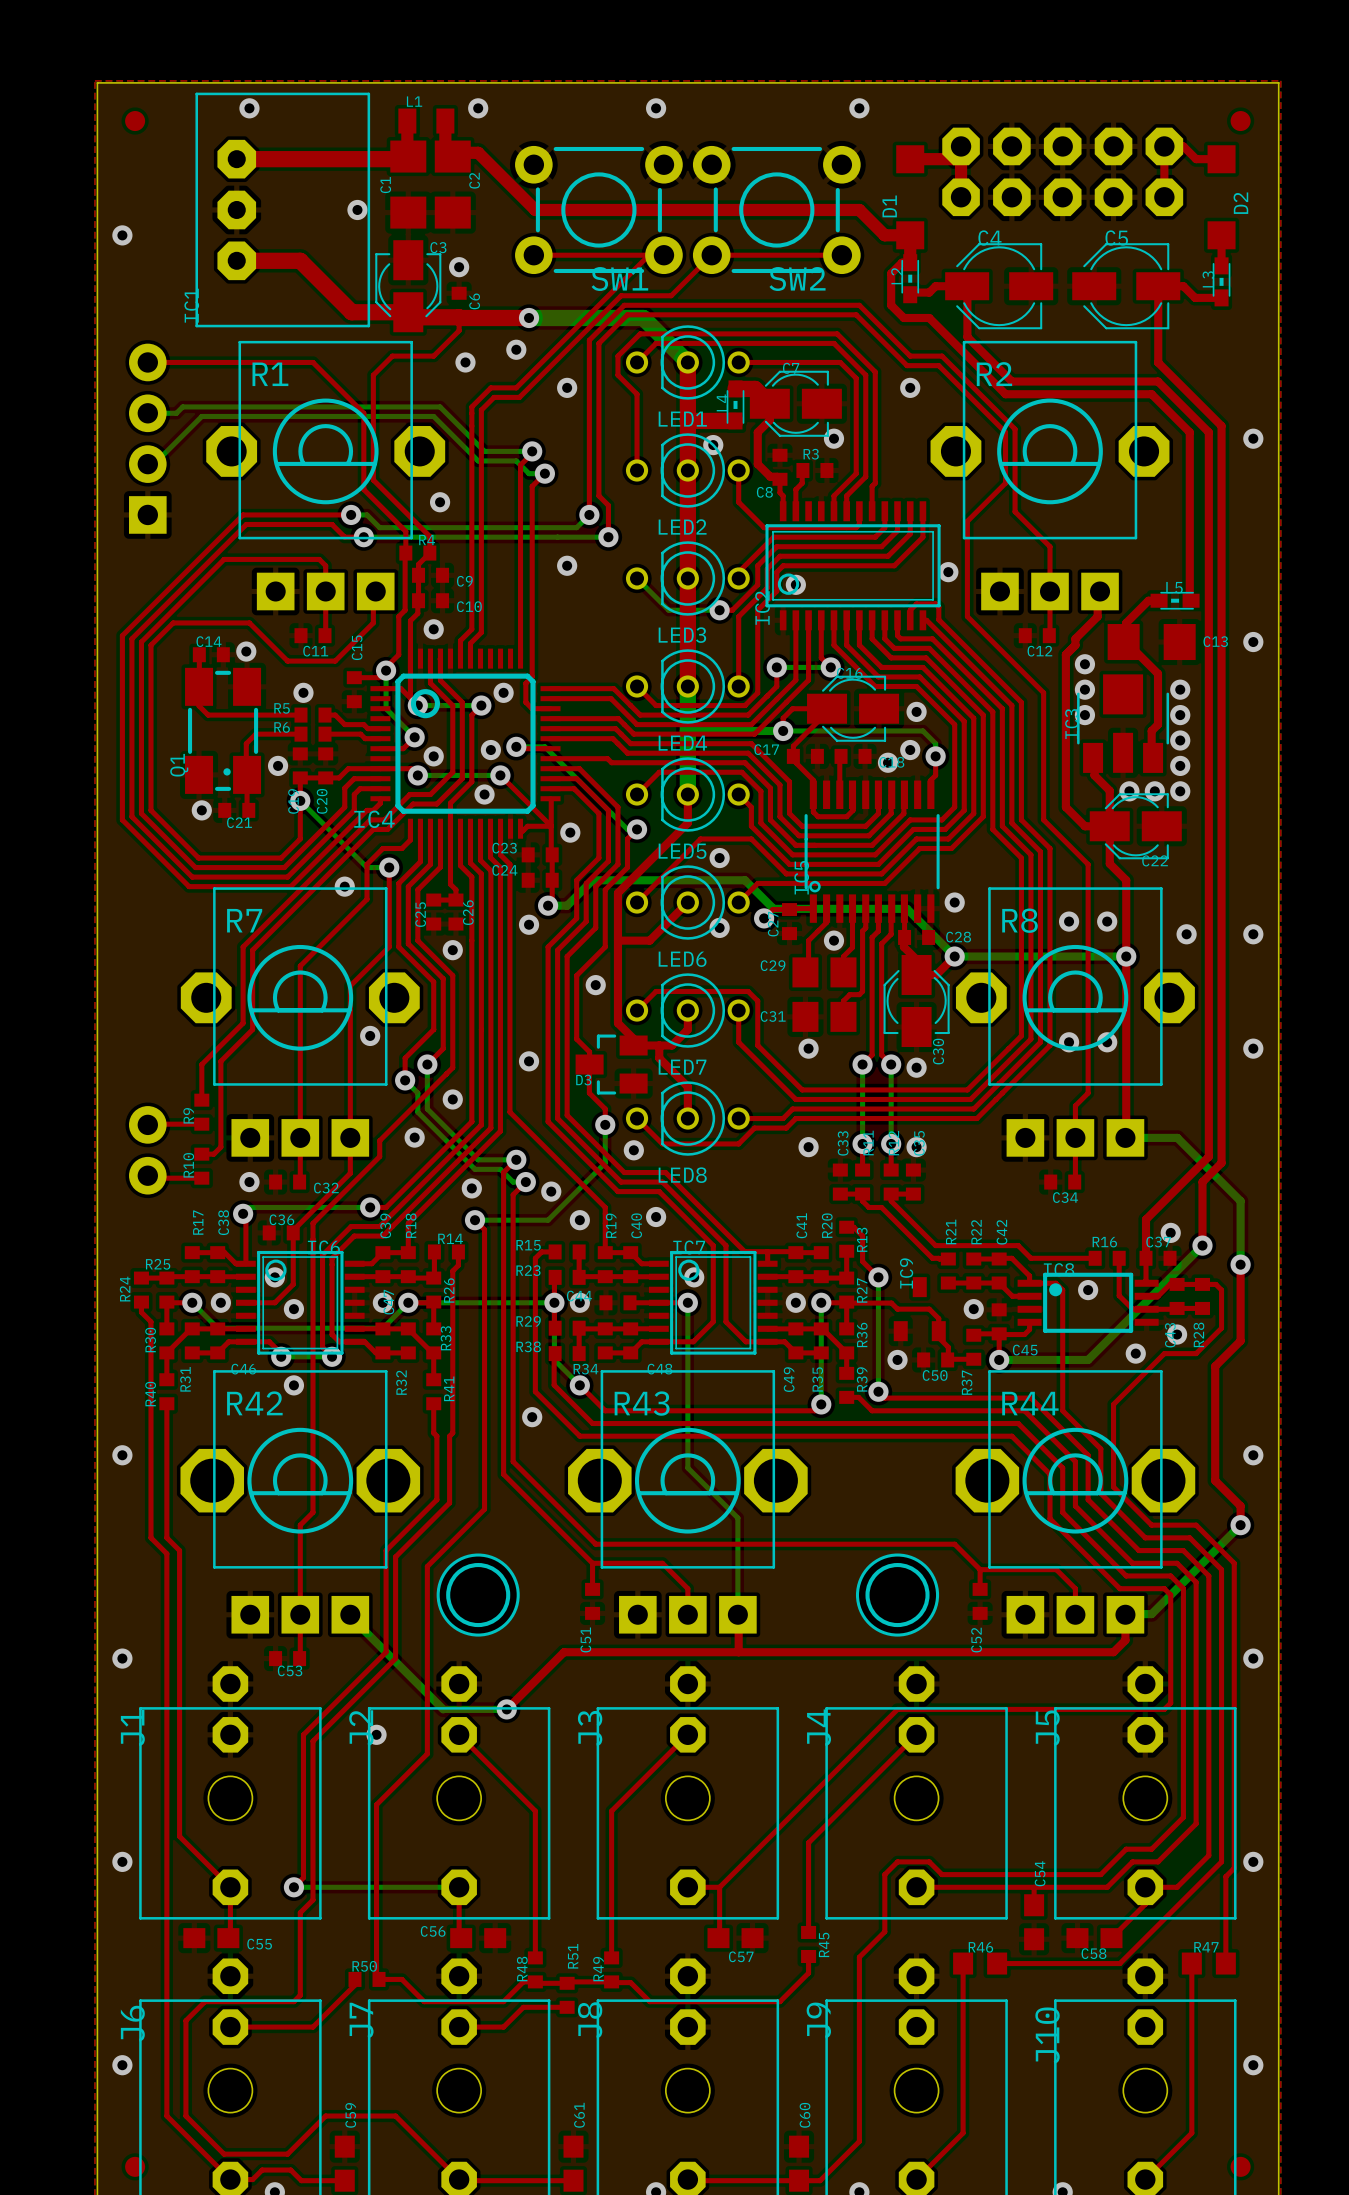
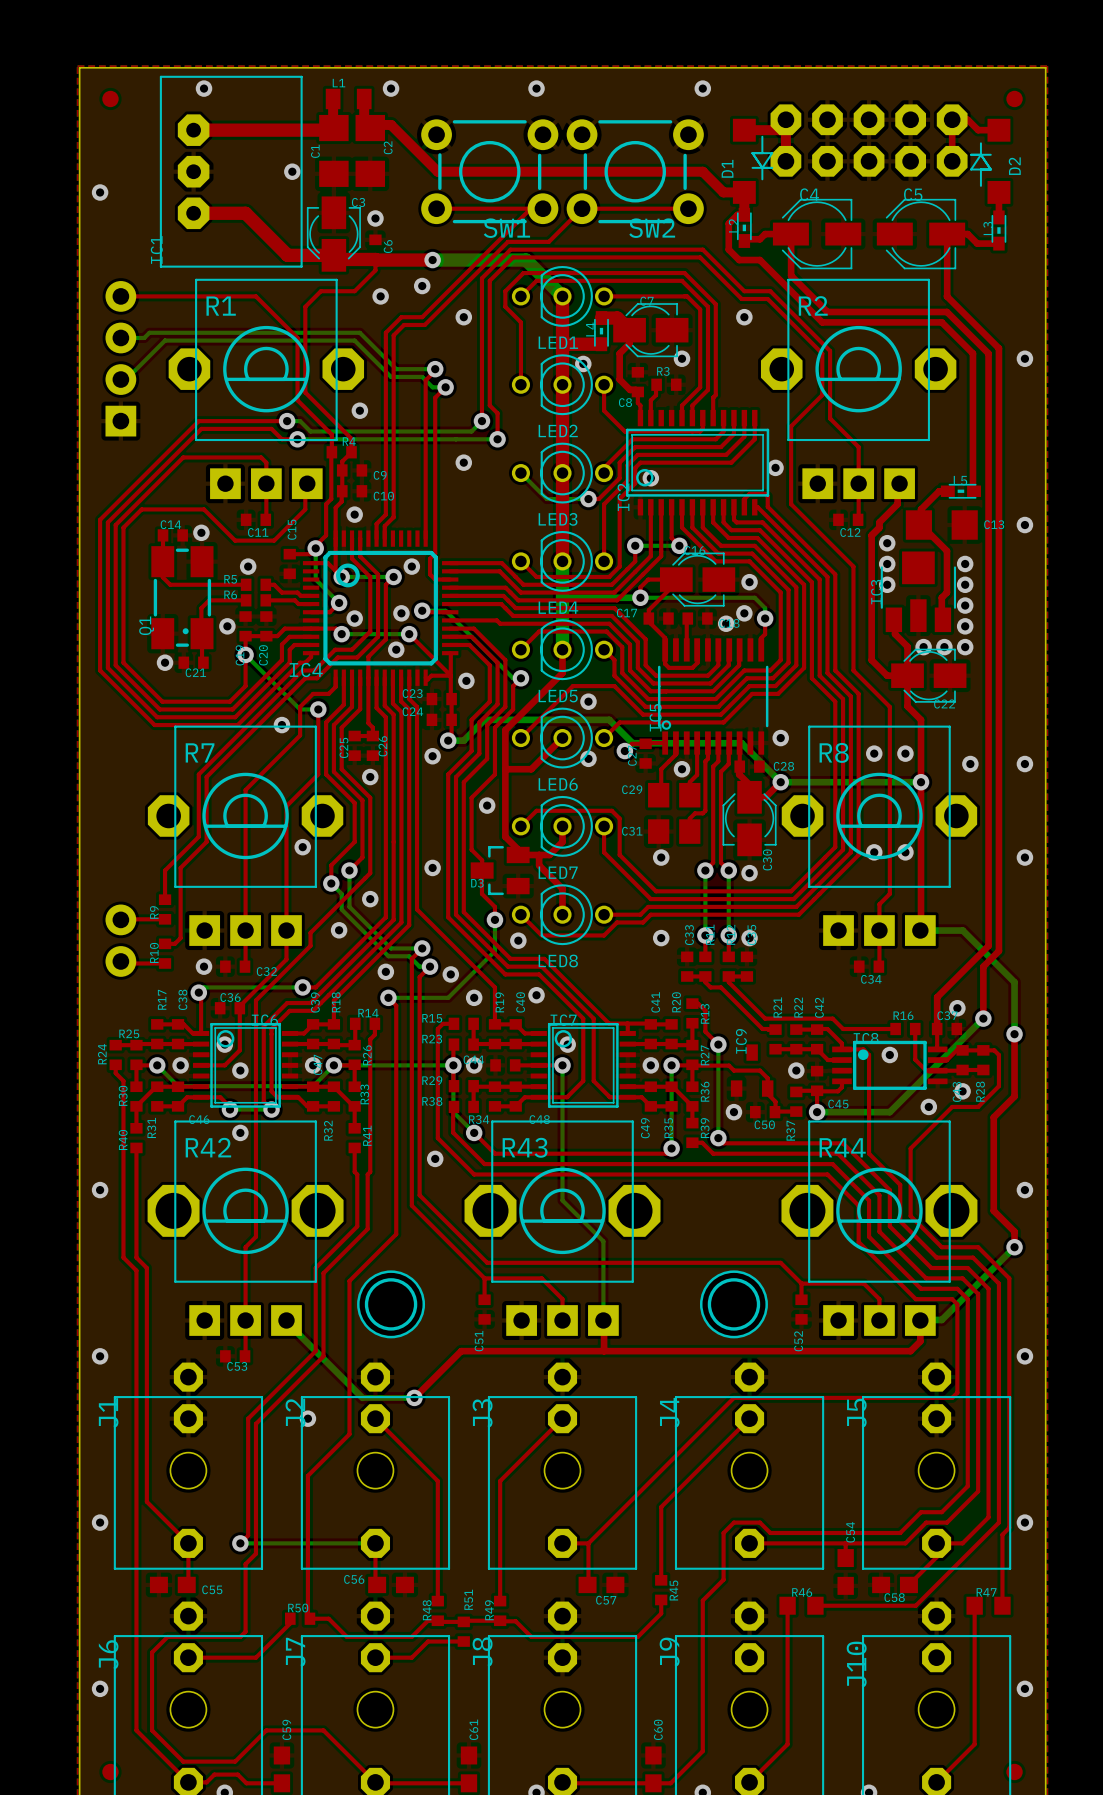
D1 footprint: [896, 145, 925, 250] -> [732, 118, 774, 204]
D2 footprint: [1207, 145, 1236, 250] -> [970, 118, 1011, 204]

